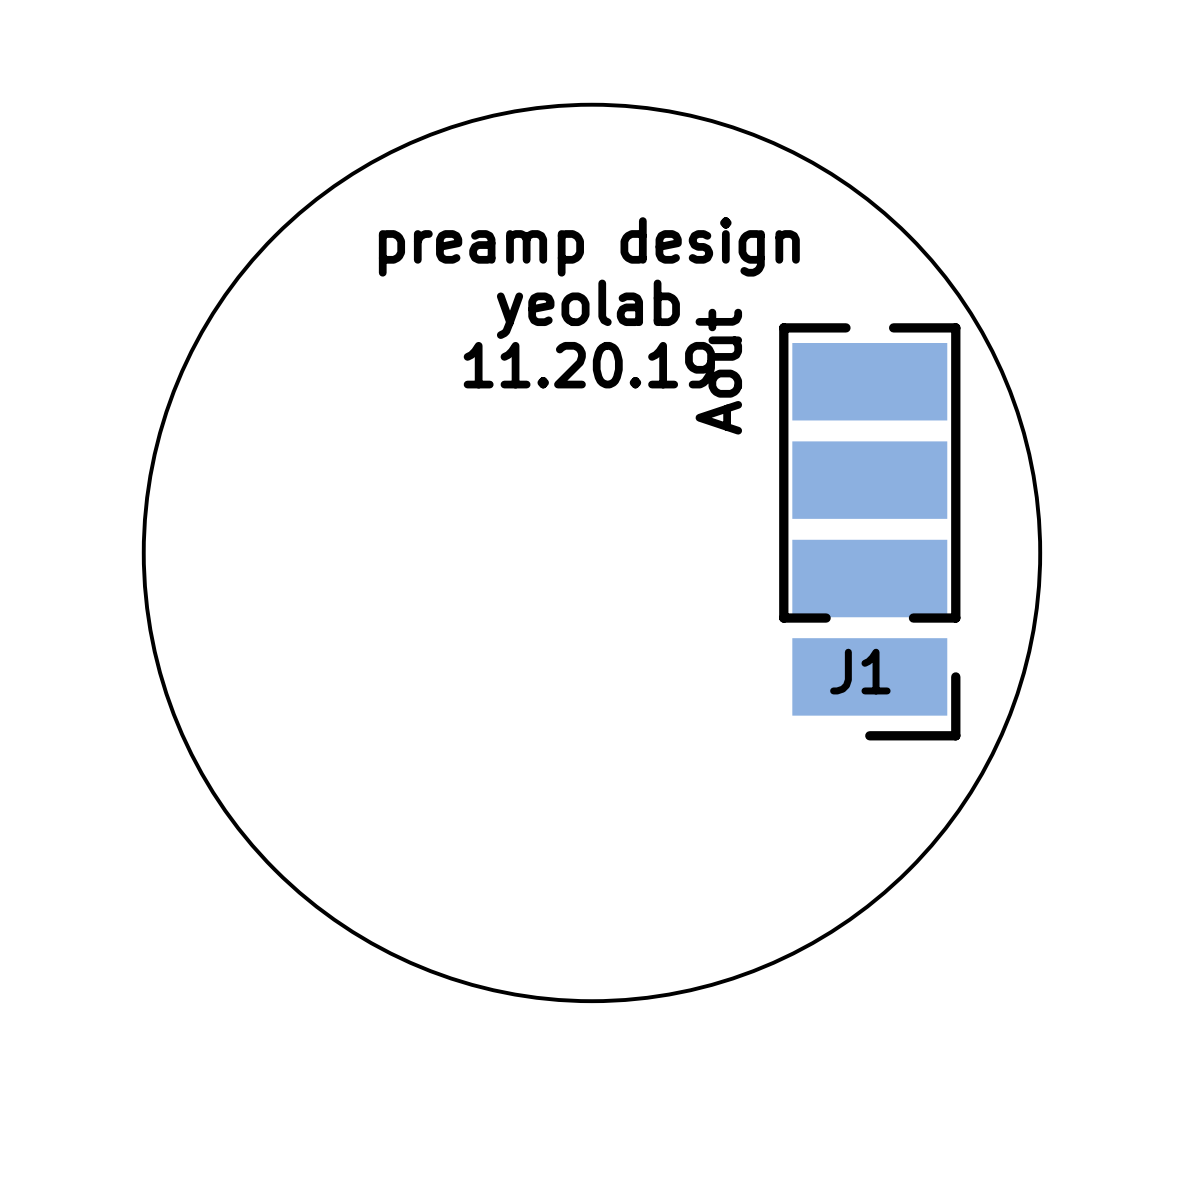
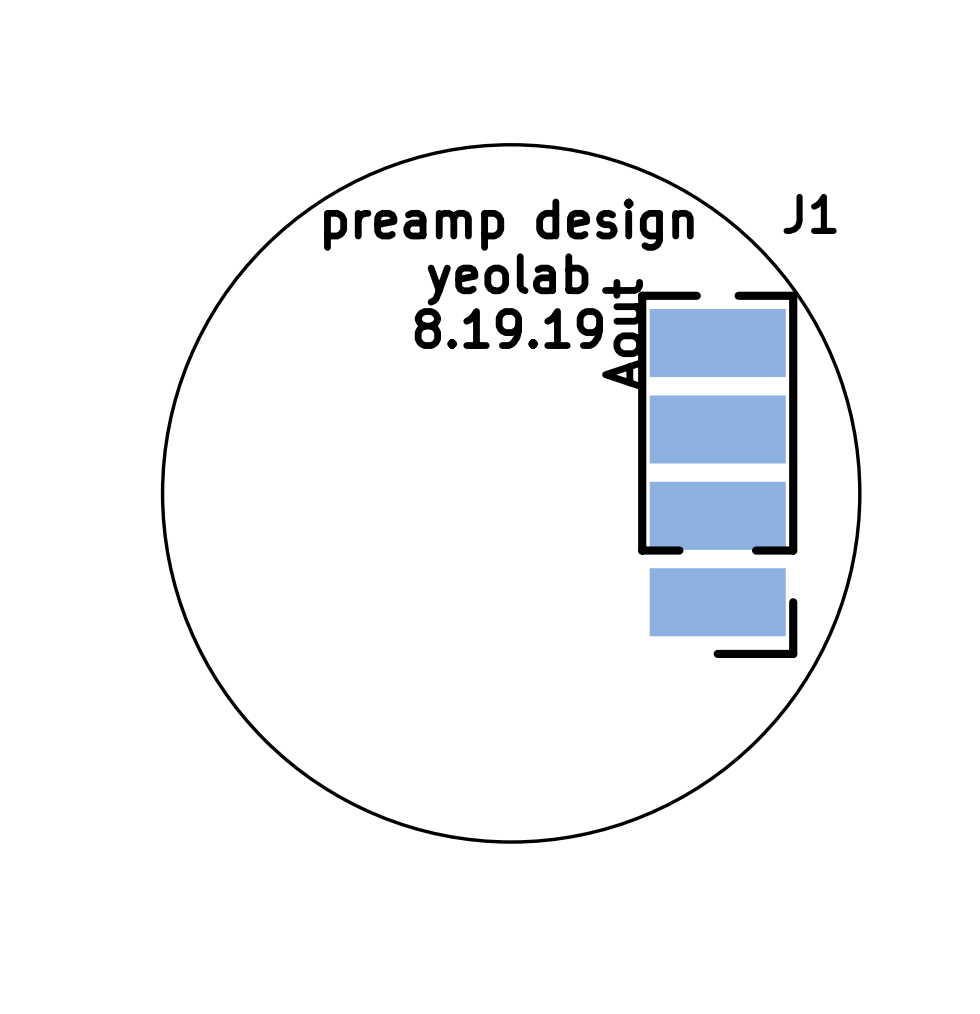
round board edge size: [141, 102, 1043, 1004] -> [160, 143, 862, 844]
text: 11.20.19 (589, 365) -> 8.19.19 (508, 328)
J1 position: (869, 531) -> (717, 474)
J1 name position: J1 (860, 671) -> J1 (810, 213)

